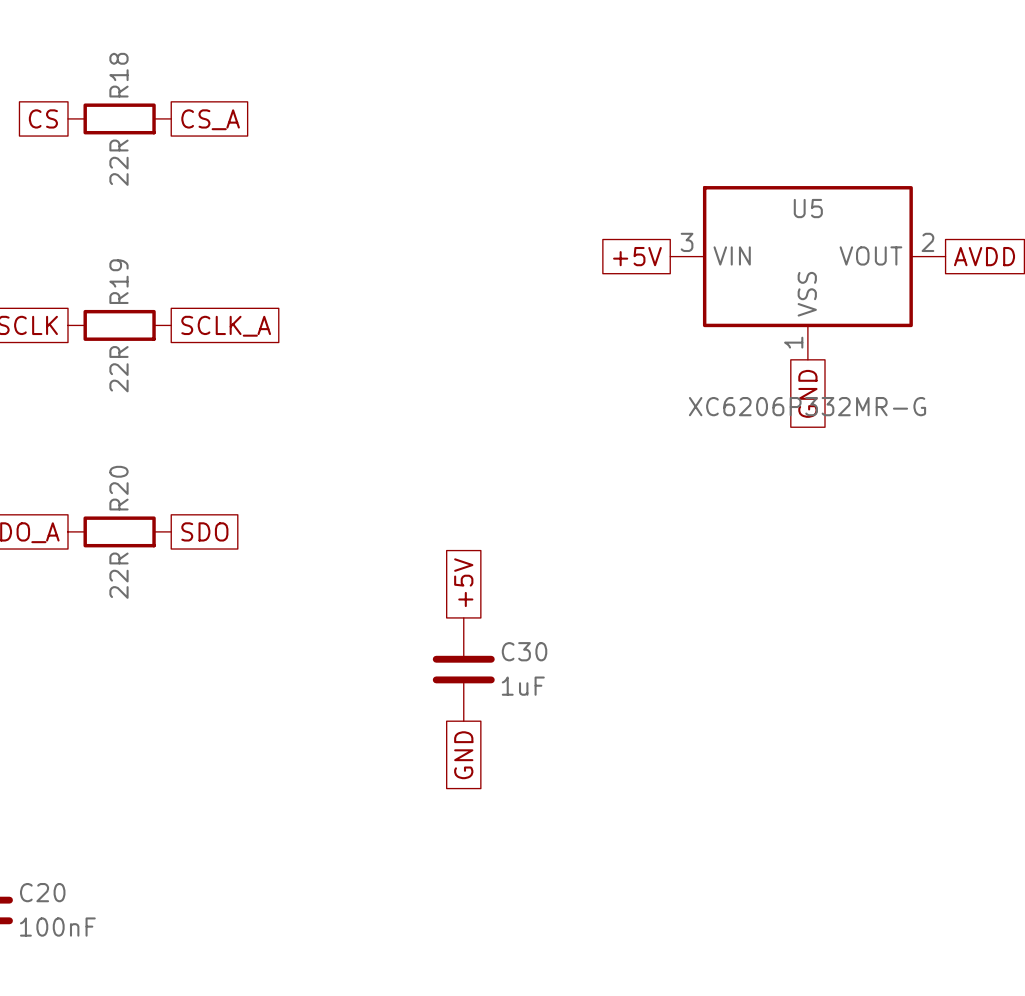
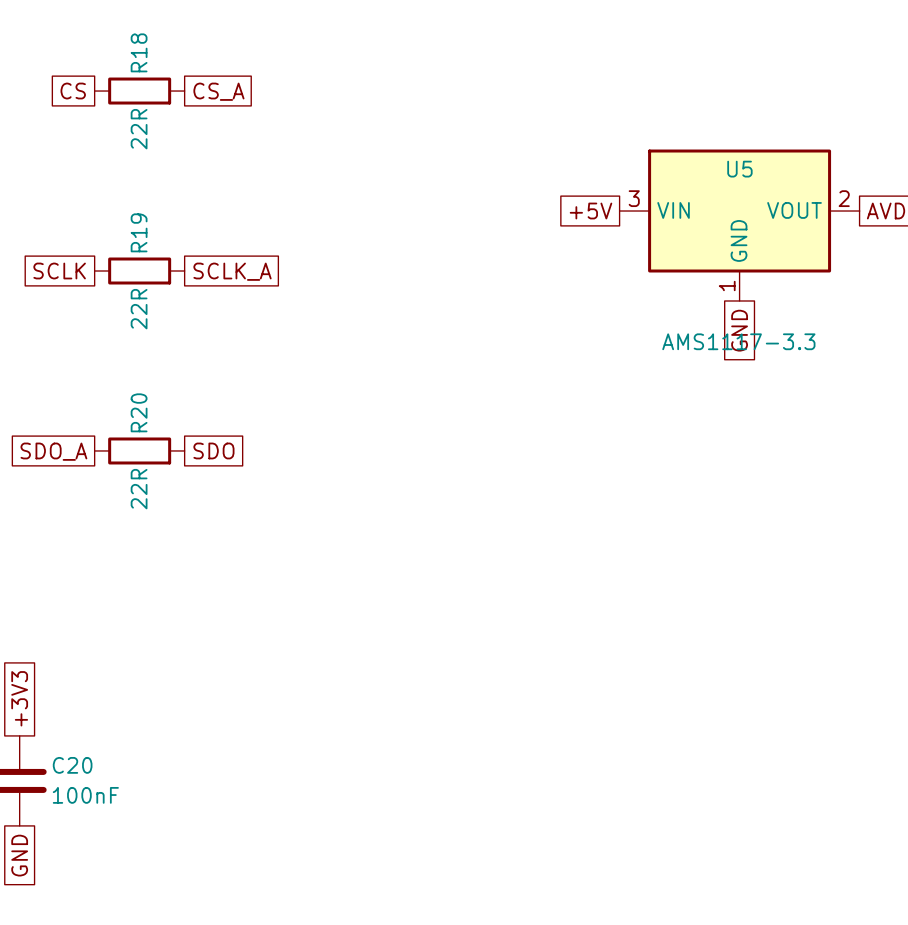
U5 pin name: VSS (807, 294) -> GND (739, 240)
U5 value: XC6206P332MR-G (807, 406) -> AMS1117-3.3 (738, 341)
global label: +5V (463, 582) -> none
C30: 1uF (463, 669) -> none
global label: GND (463, 755) -> none

